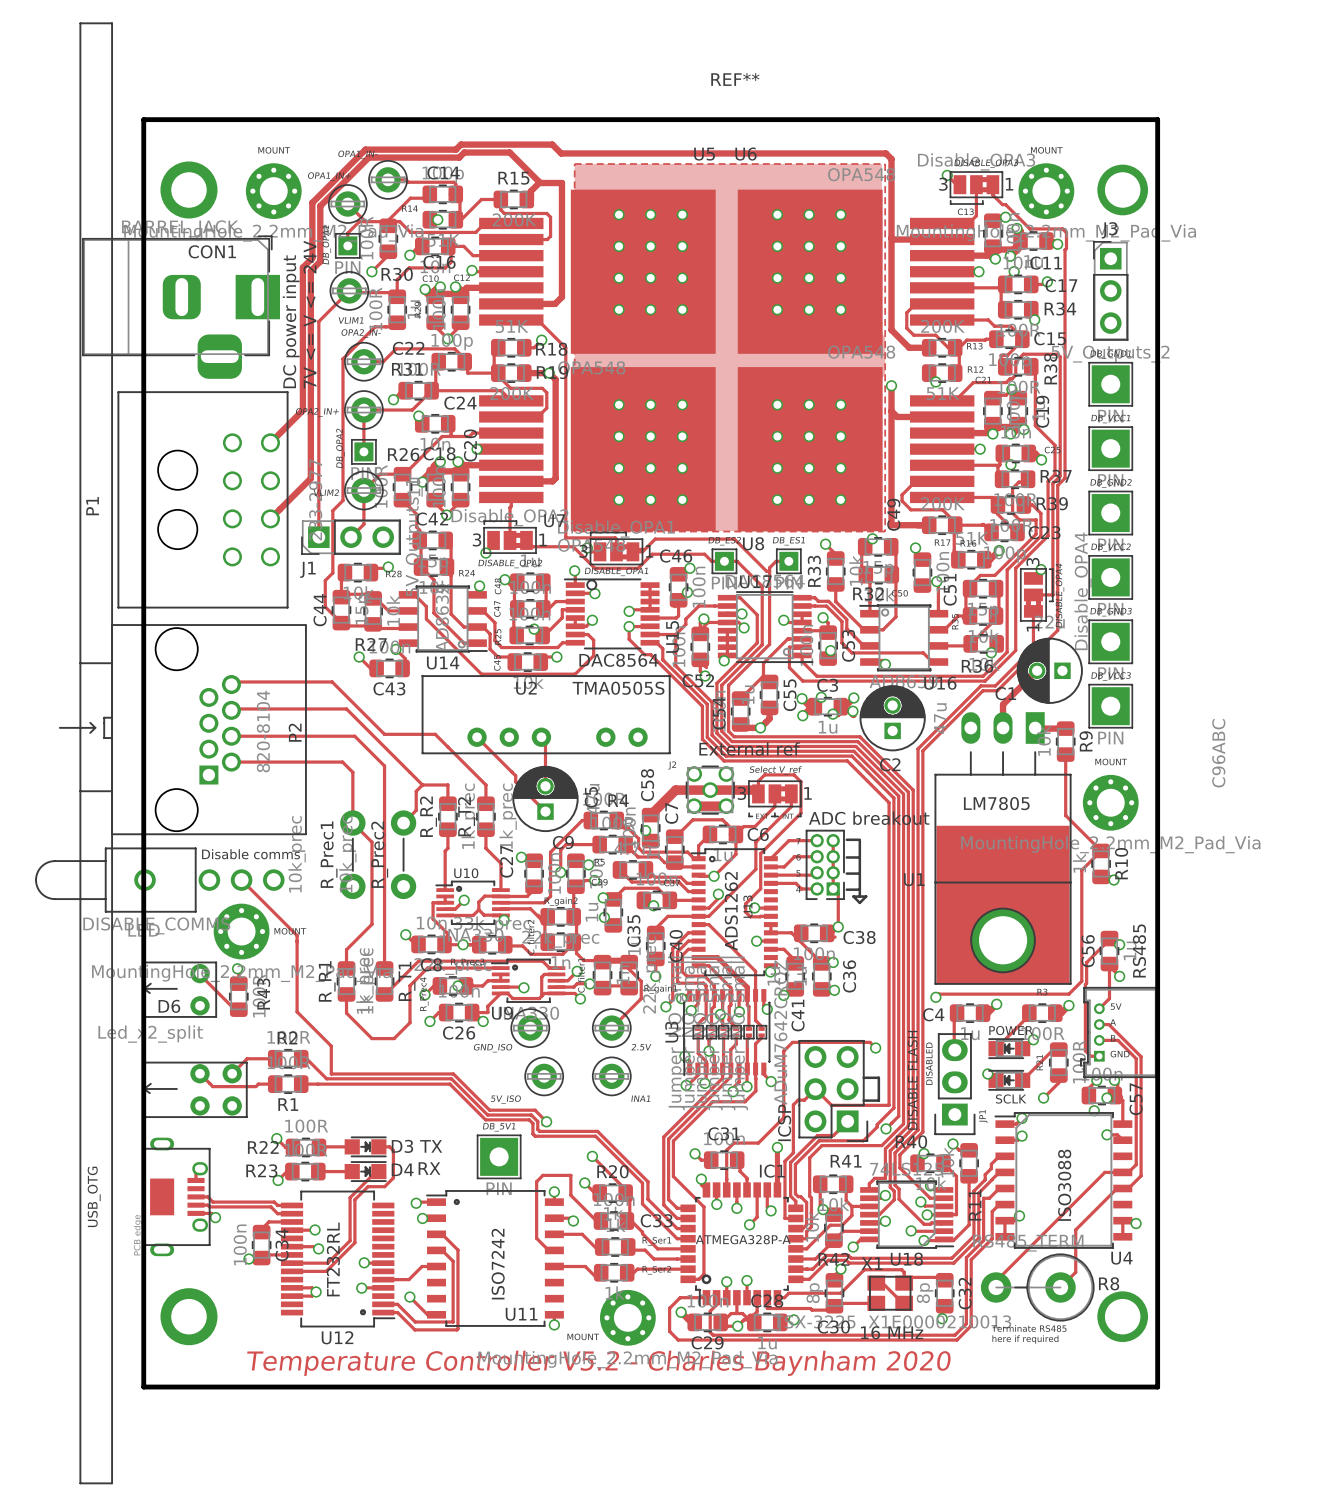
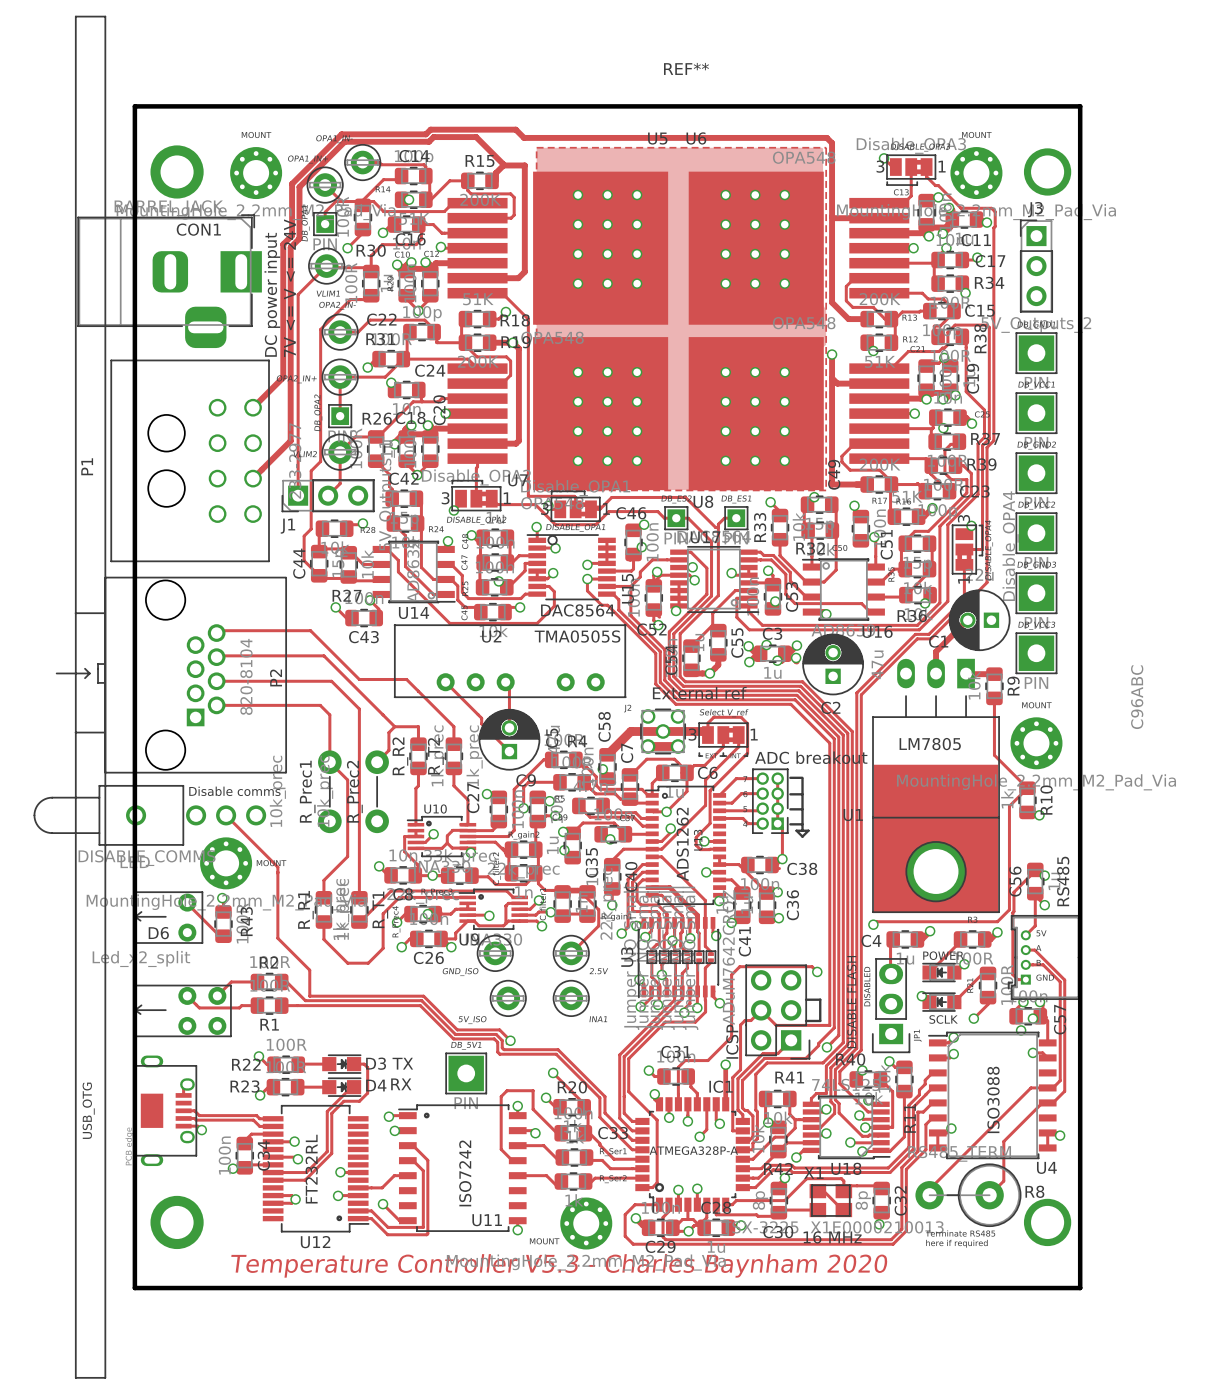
text: Temperature Controller V5.2 - Charles Baynham 2020 (599, 1363) -> Temperature Controller V5.3 - Charles Baynham 2020 (559, 1265)

